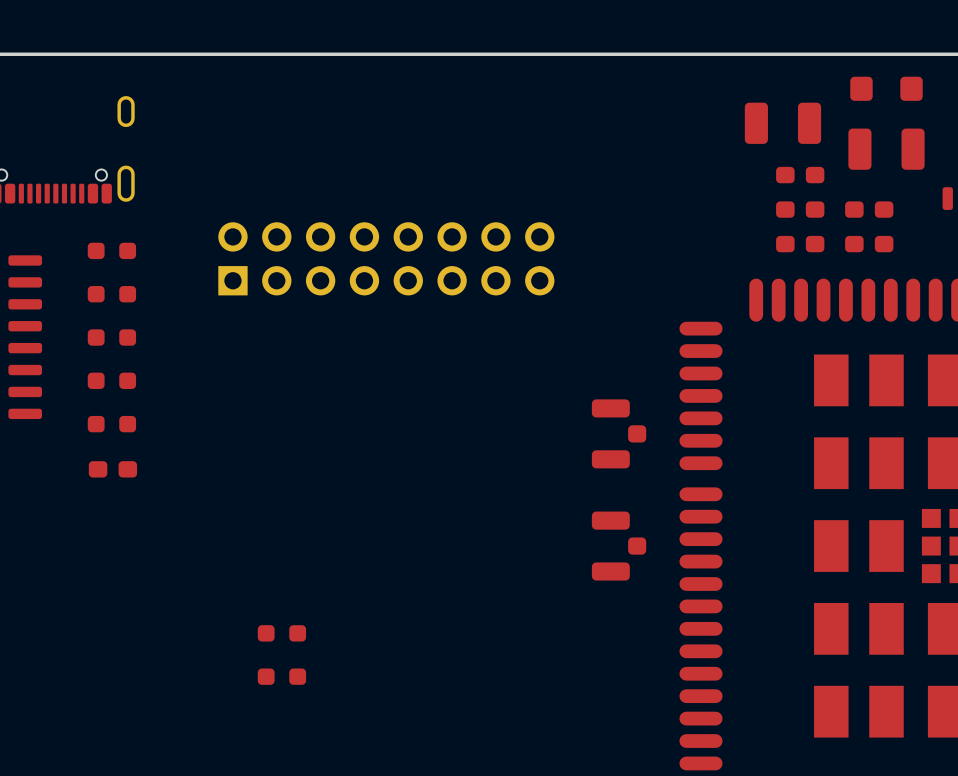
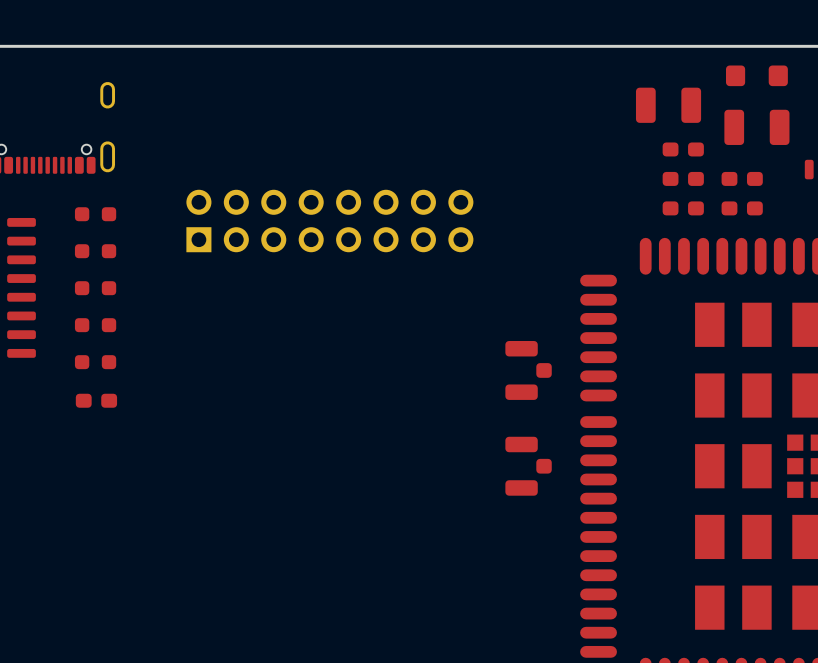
part: (281, 633) -> none
part: (281, 676) -> none

